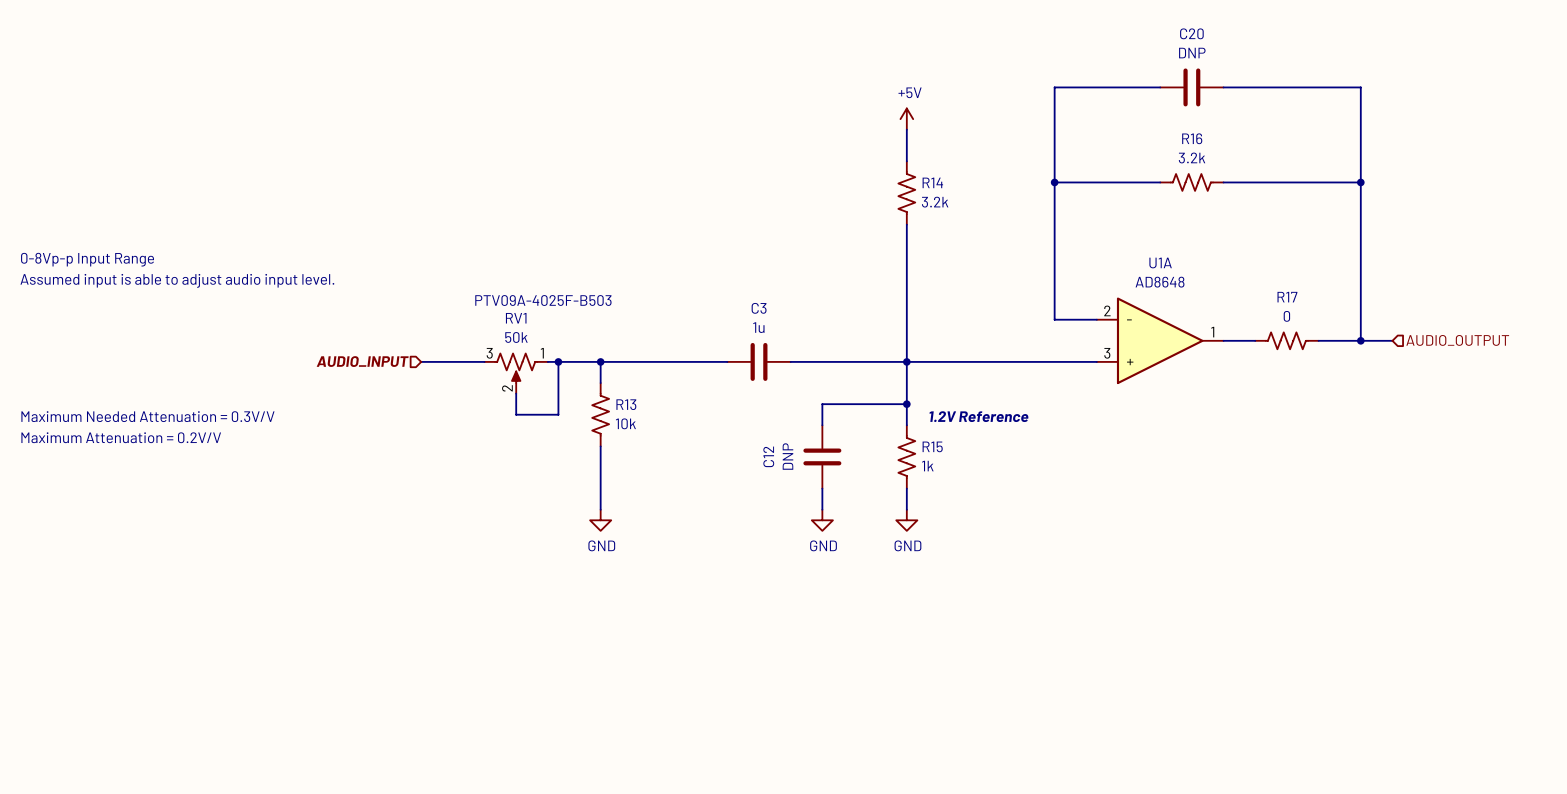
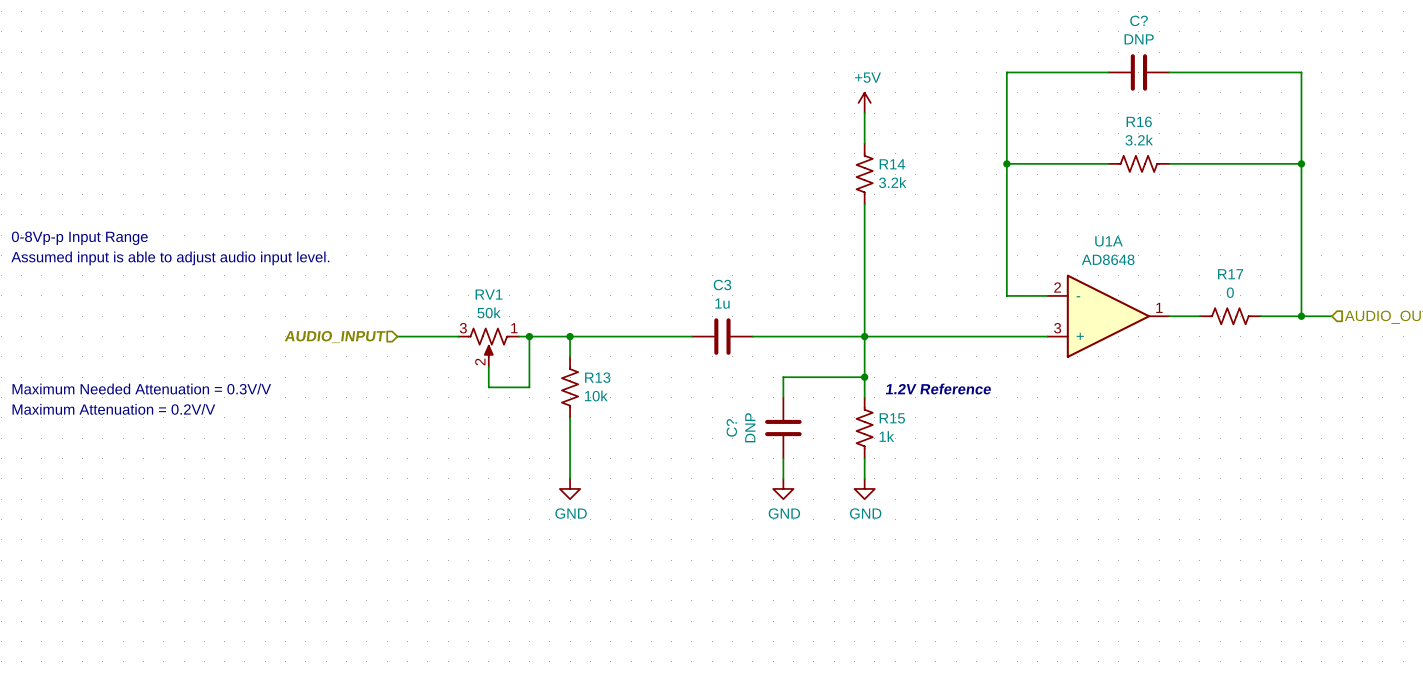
C20 name: C20 (1191, 33) -> C? (1139, 20)
text: PTV09A-4025F-B503 (543, 300) -> none
C12 name: C12 (768, 456) -> C? (731, 427)

